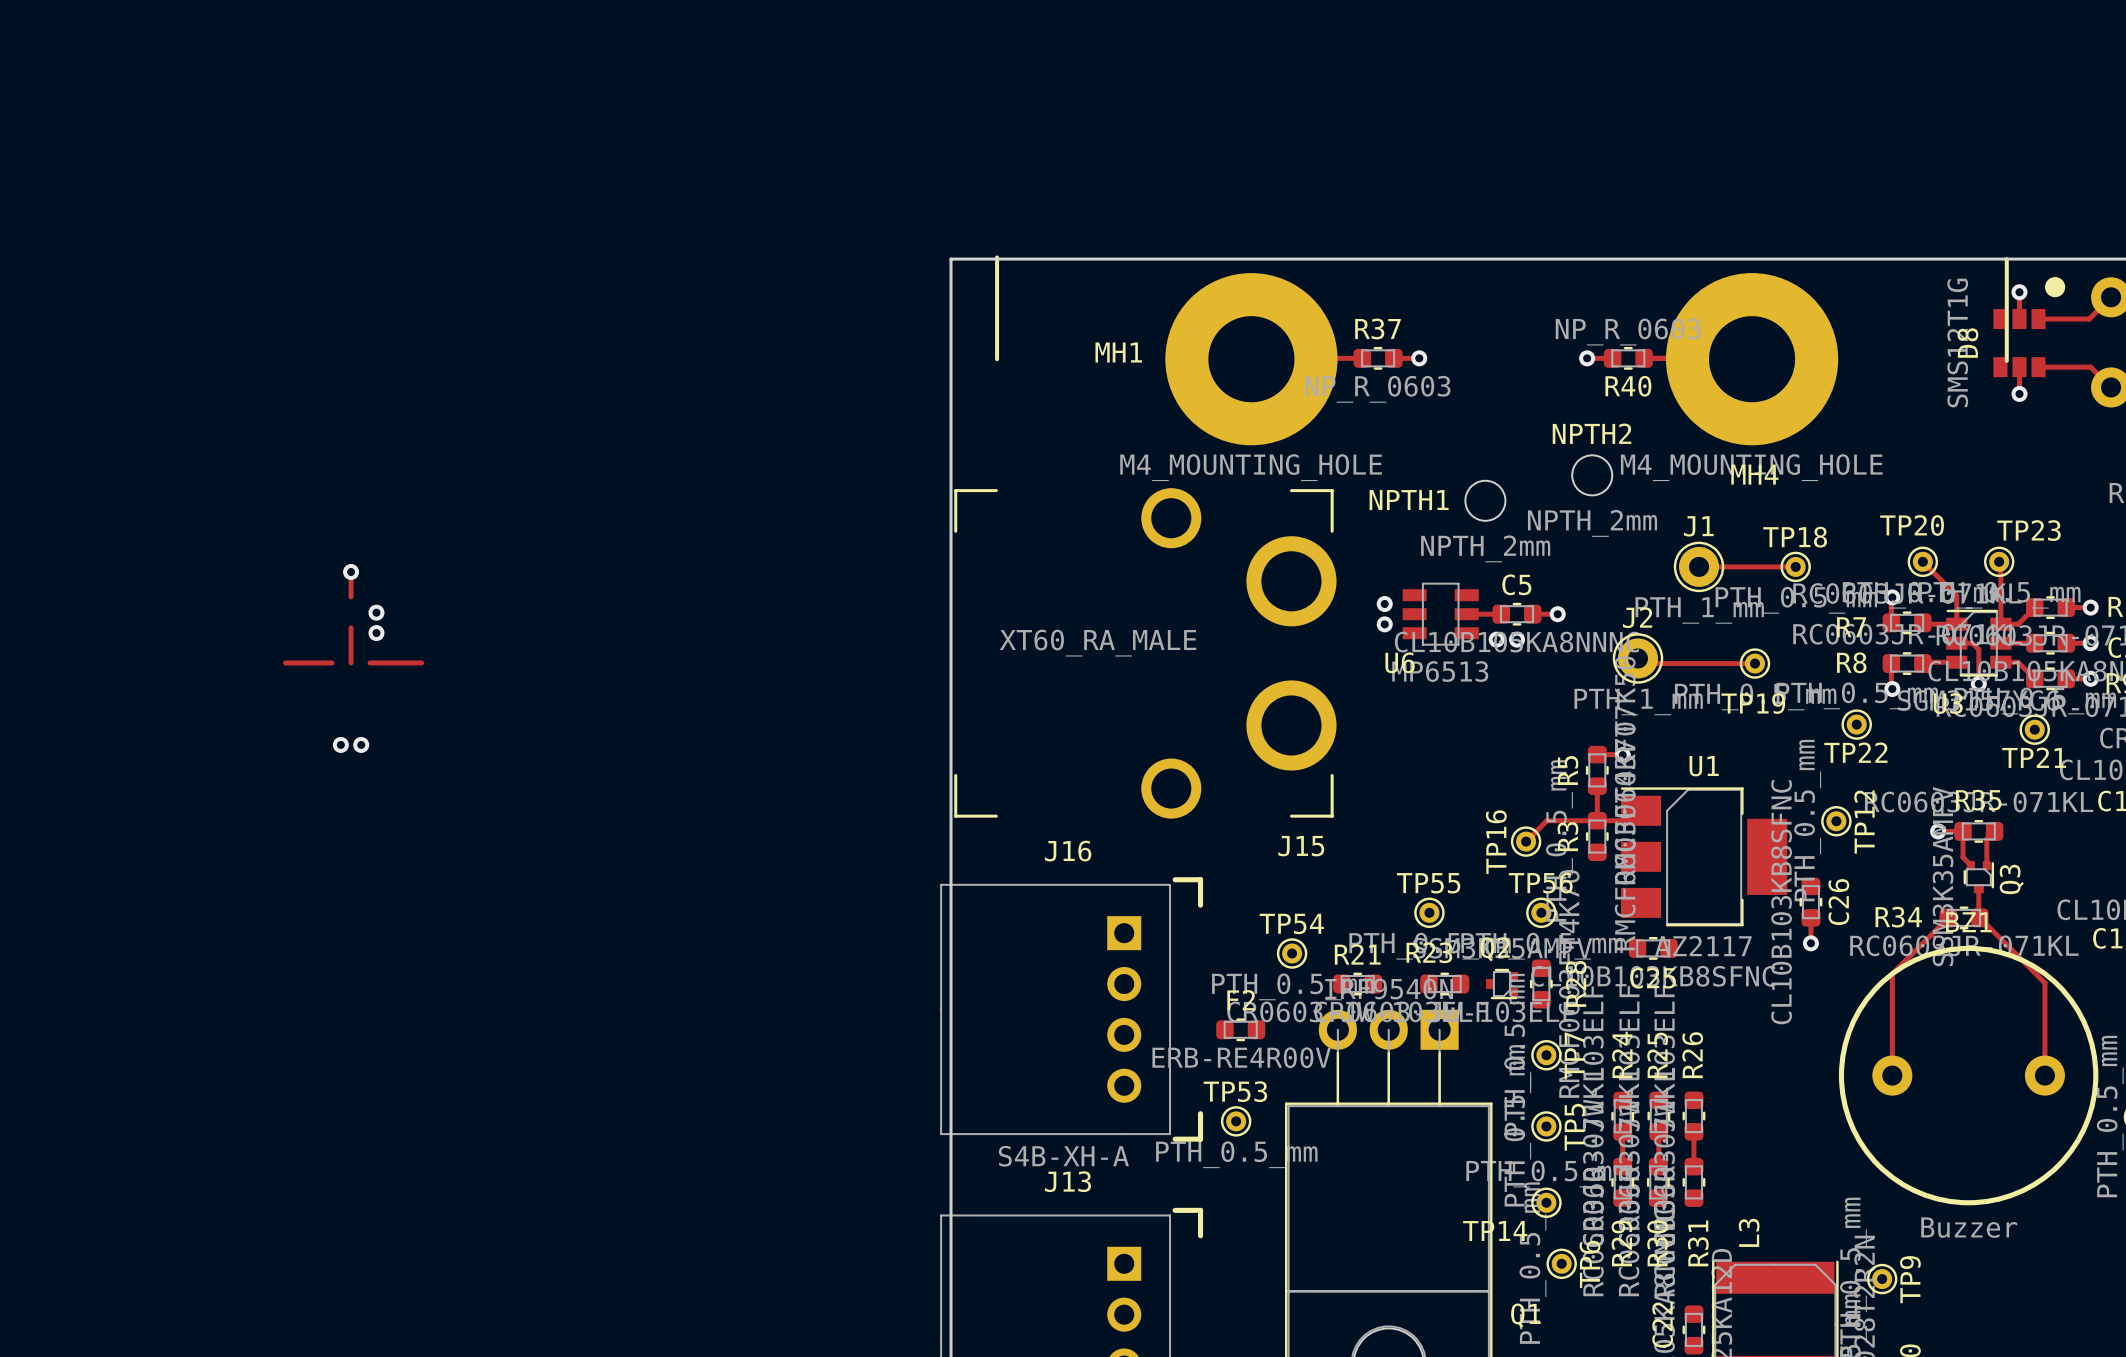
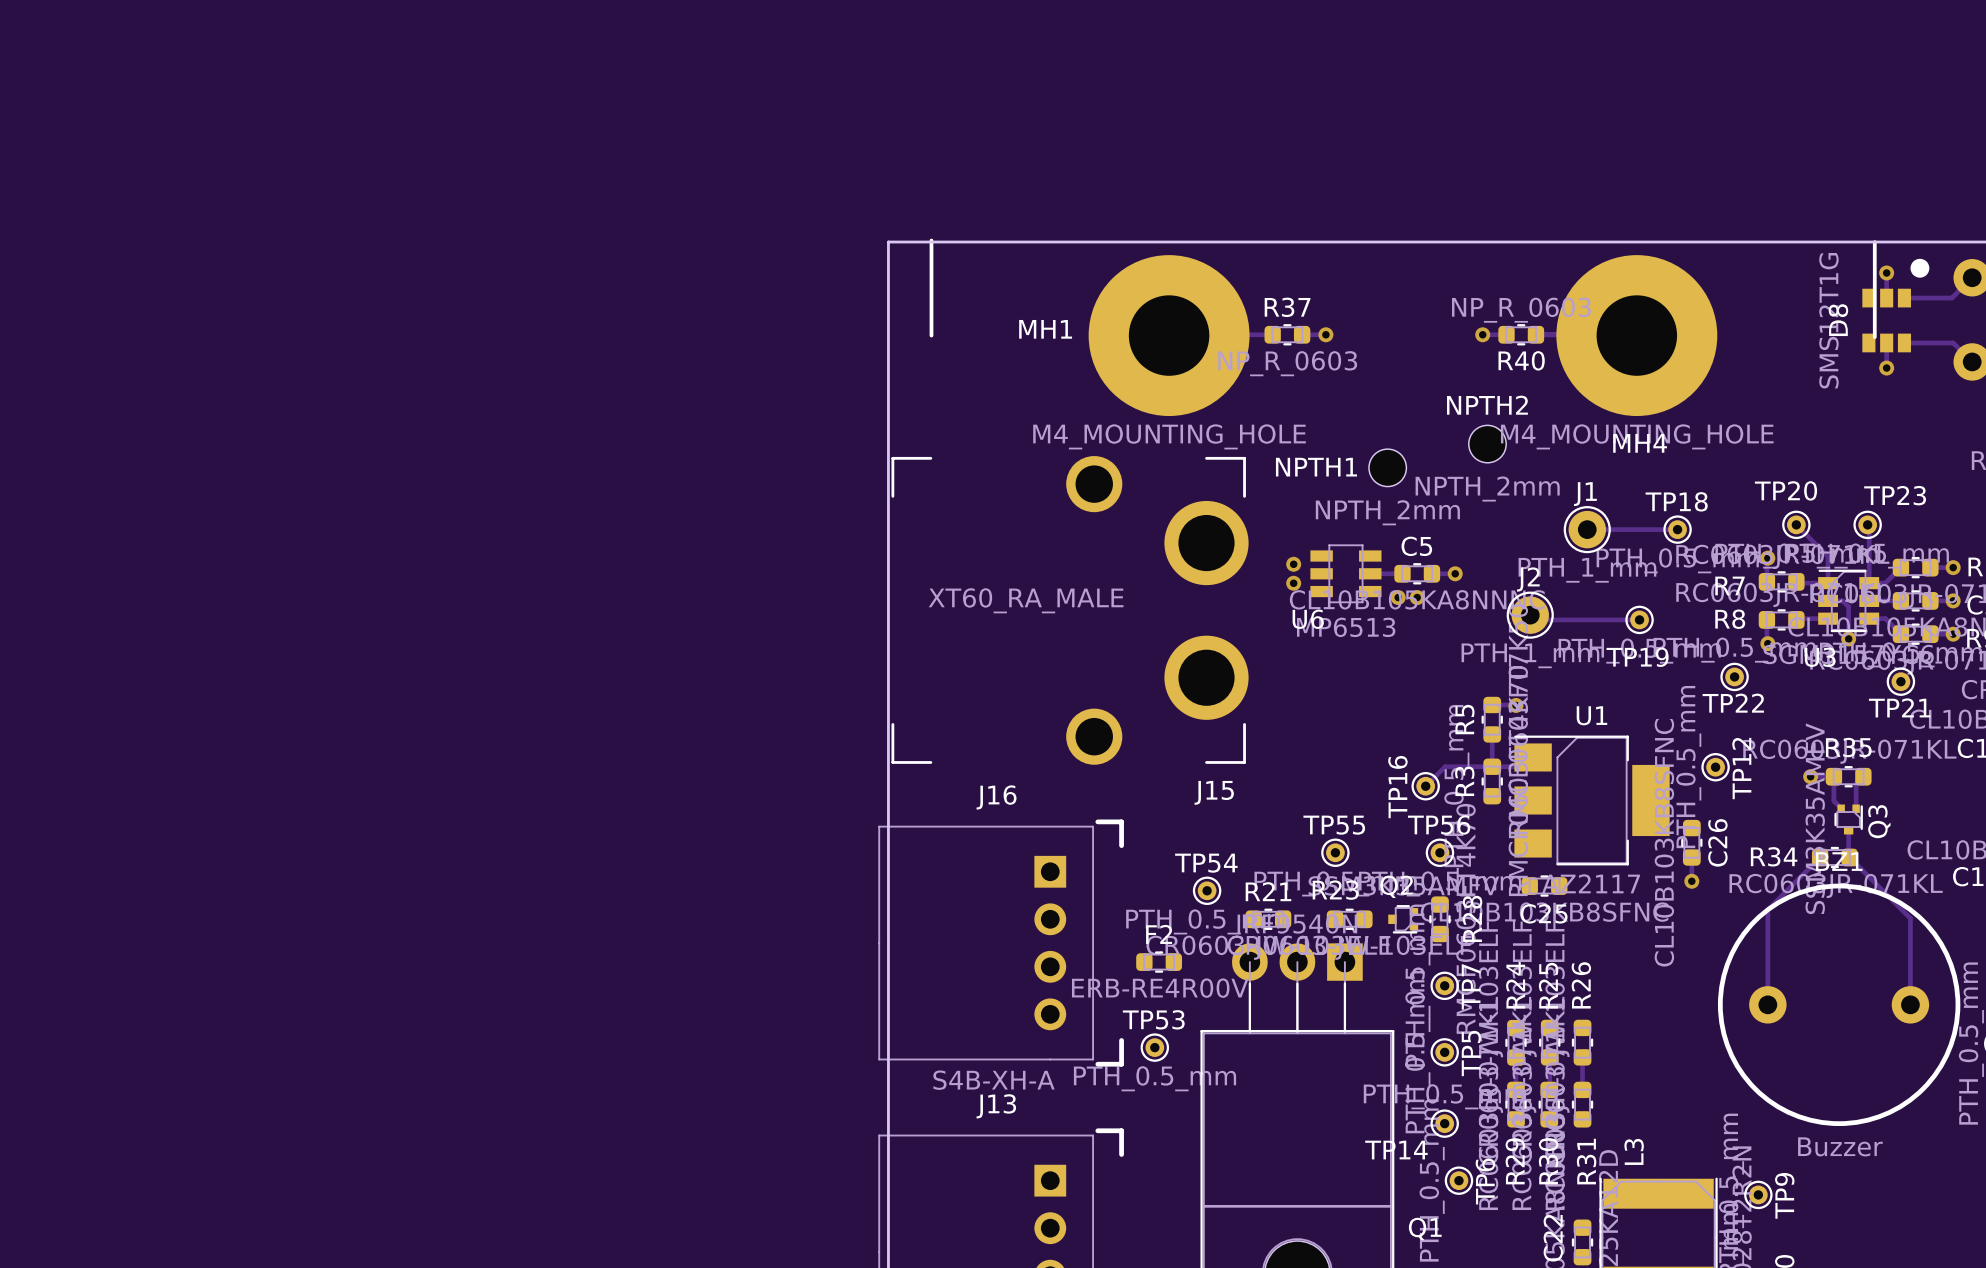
track: (351, 571) (351, 596) -> none
via: (351, 571) -> none
via: (376, 612) -> none
track: (351, 627) (351, 662) -> none
via: (376, 633) -> none
track: (285, 662) (332, 662) -> none
track: (370, 662) (421, 662) -> none
via: (340, 744) -> none
via: (361, 744) -> none

